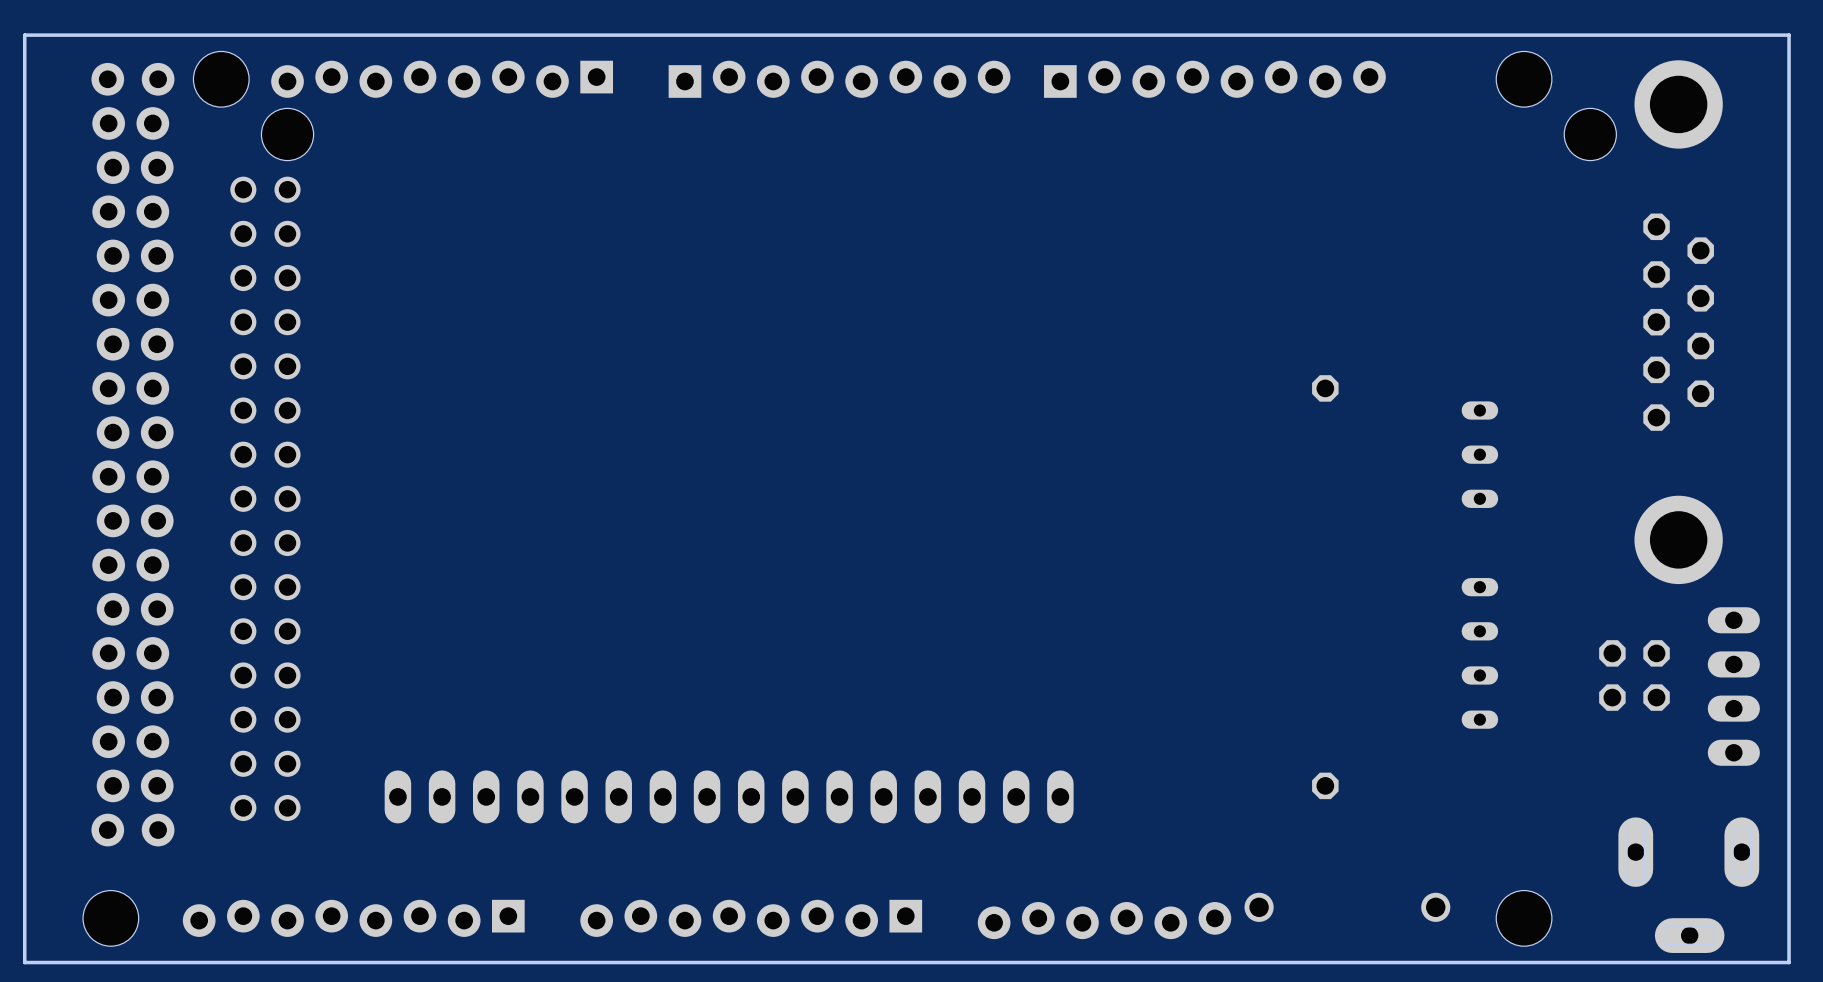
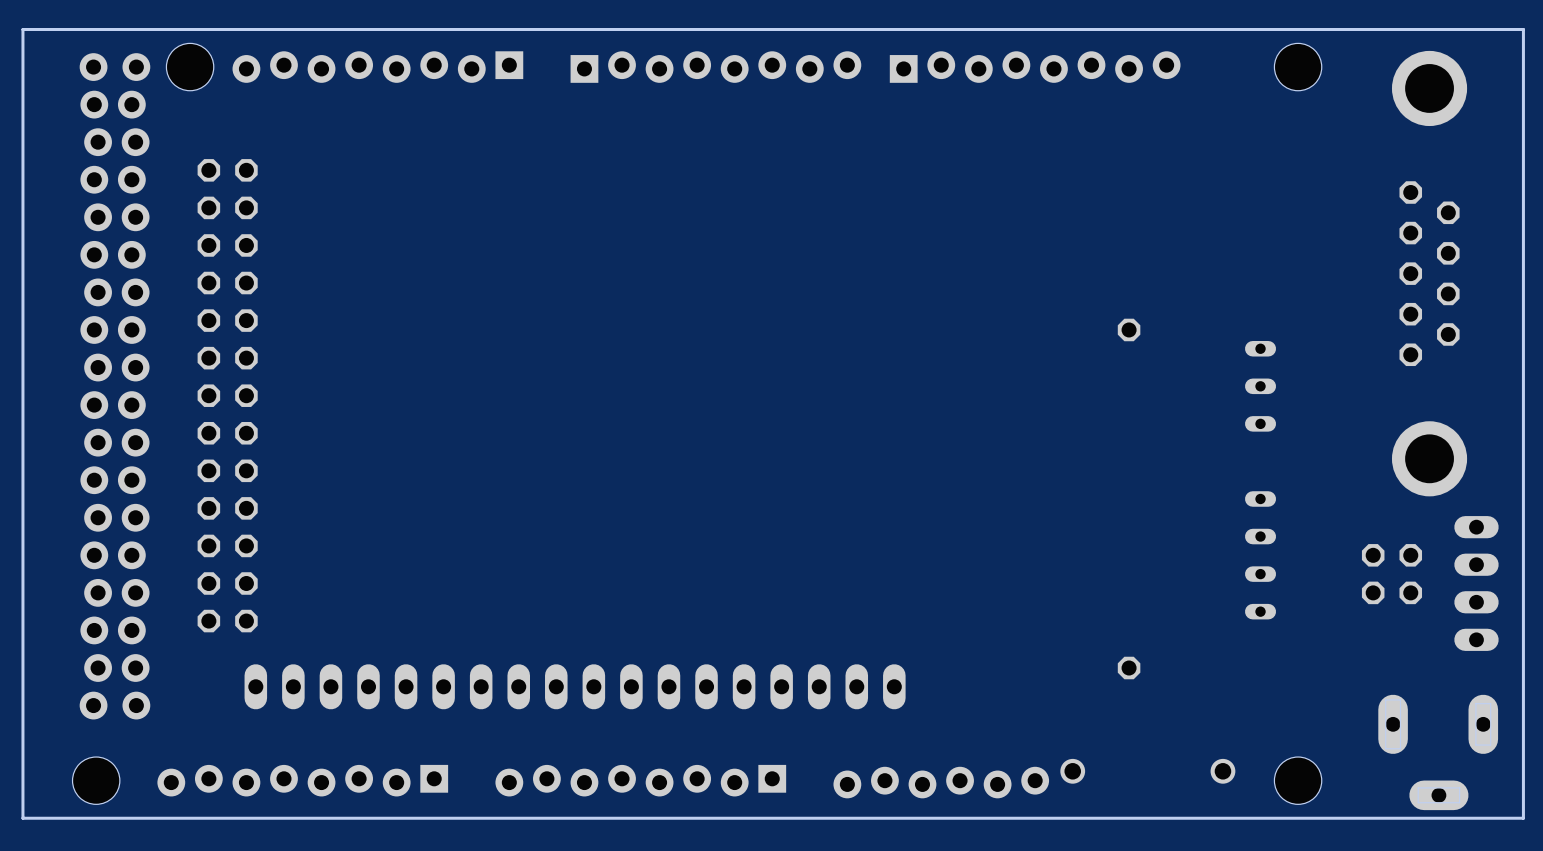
hole: (287, 134) -> none
hole: (1590, 134) -> none
part: none -> (227, 395)
part: (265, 498) -> none
part: (729, 796) -> none
part: none -> (575, 686)

